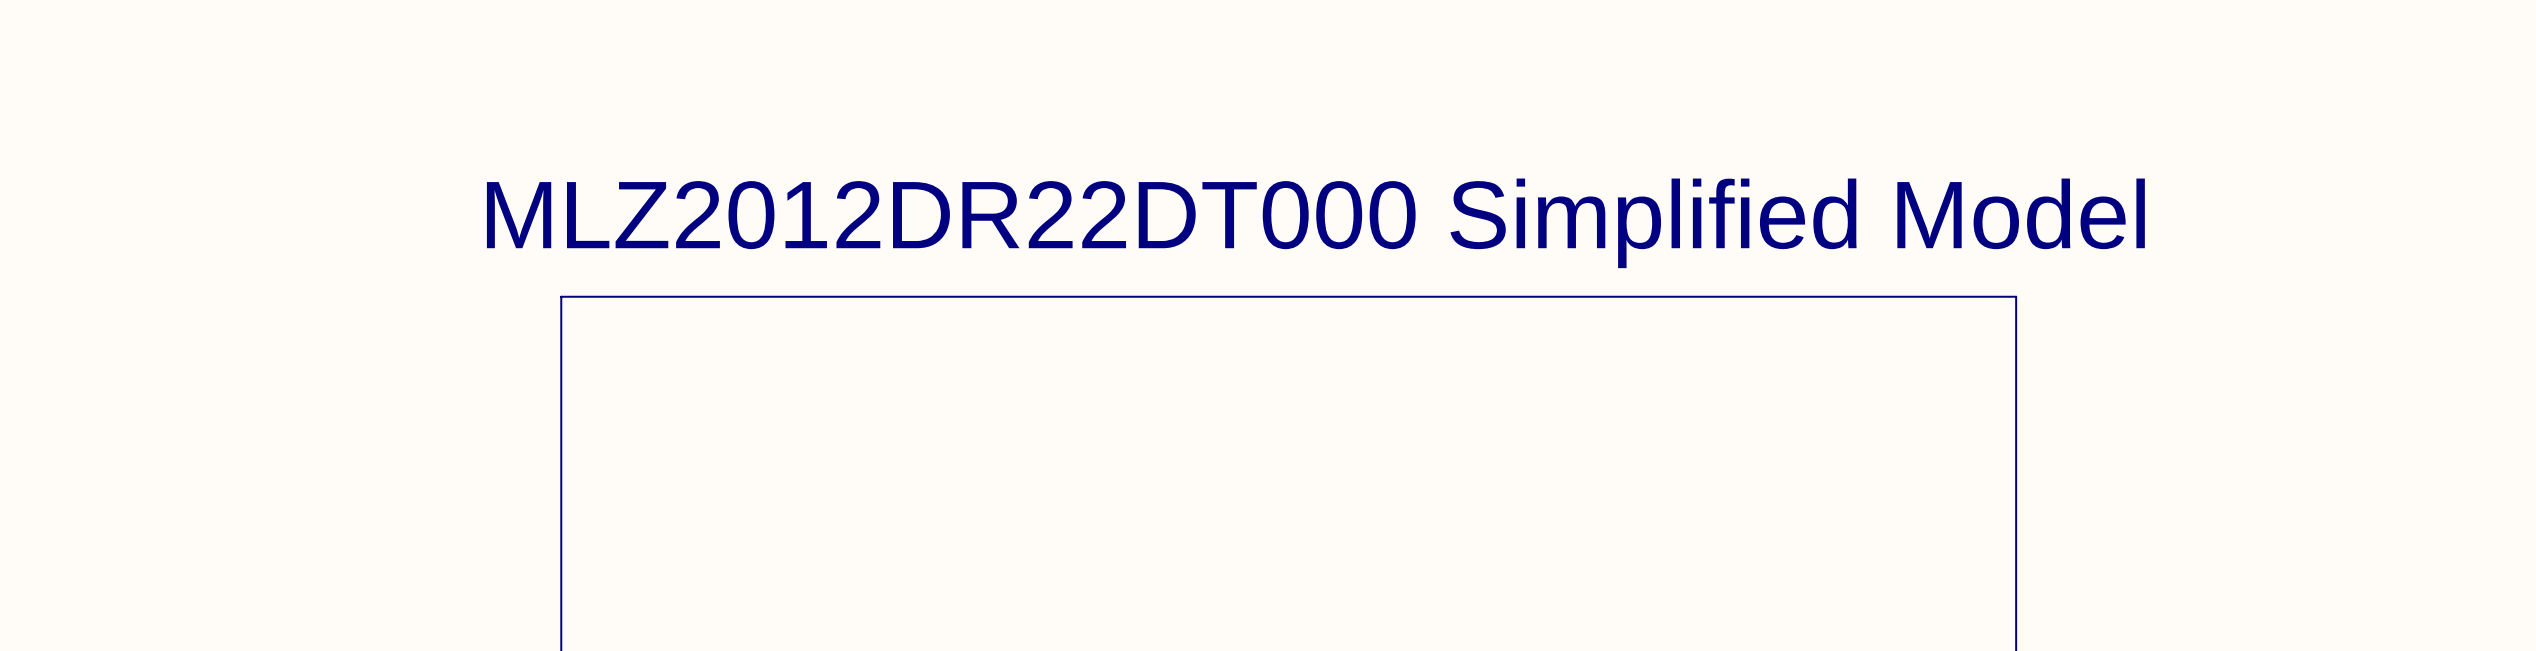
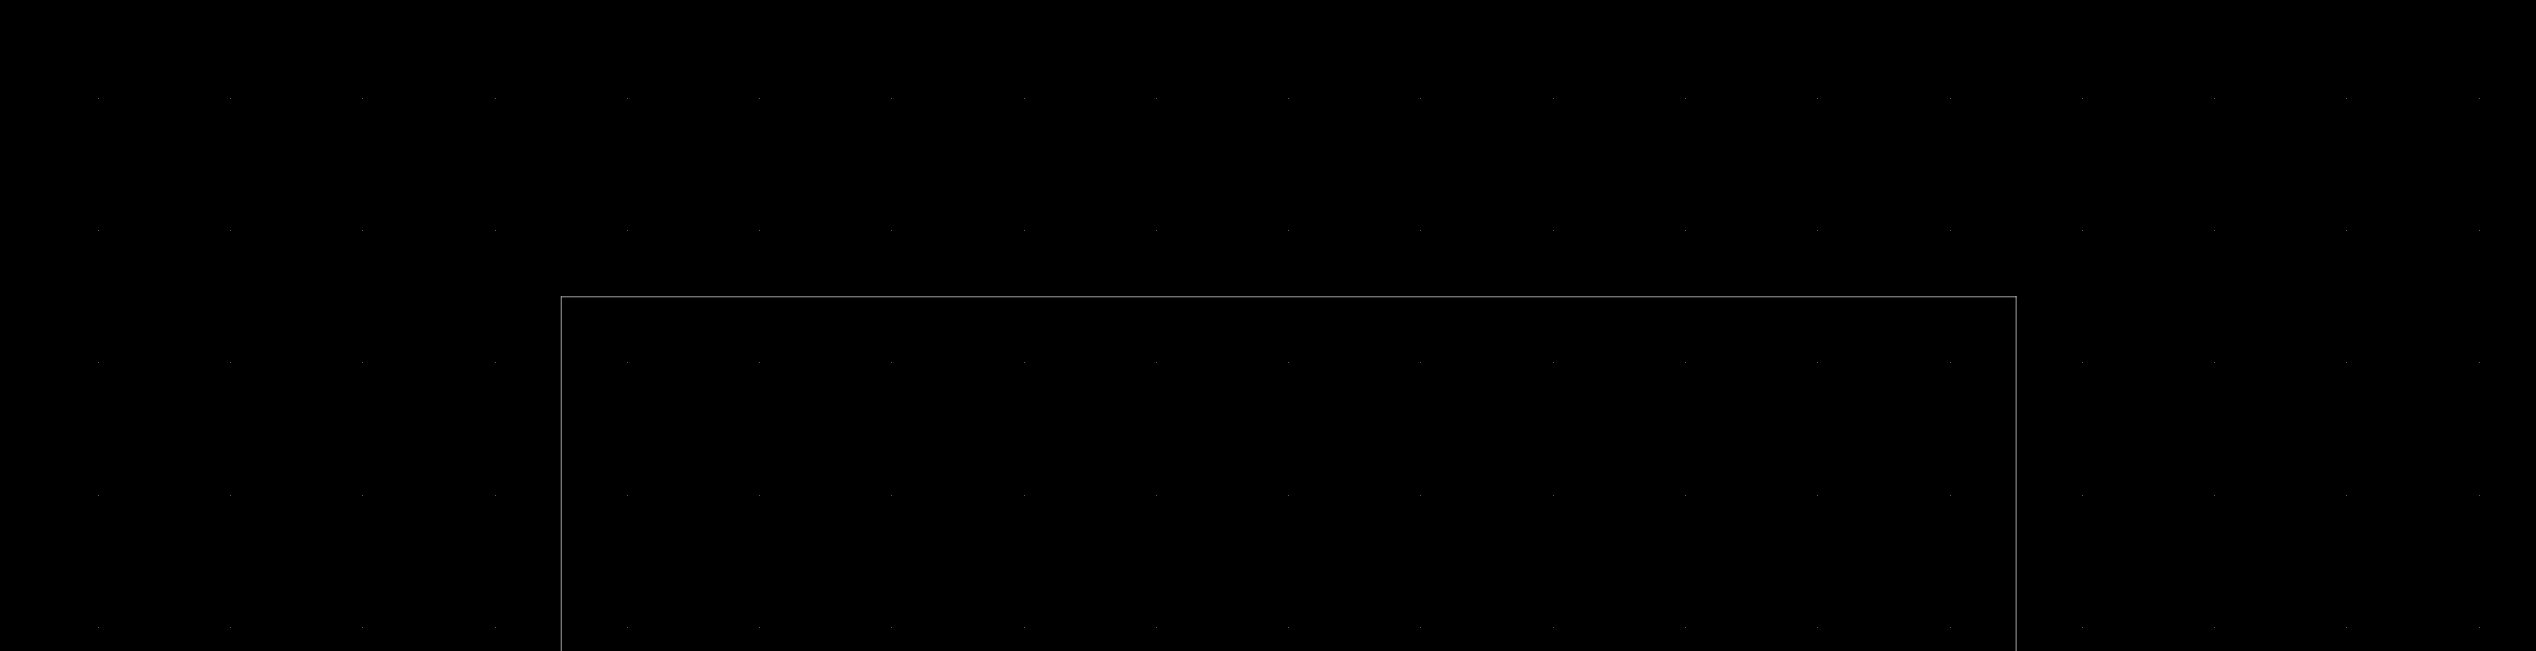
text: MLZ2012DR22DT000 Simplified Model (1315, 223) -> none

